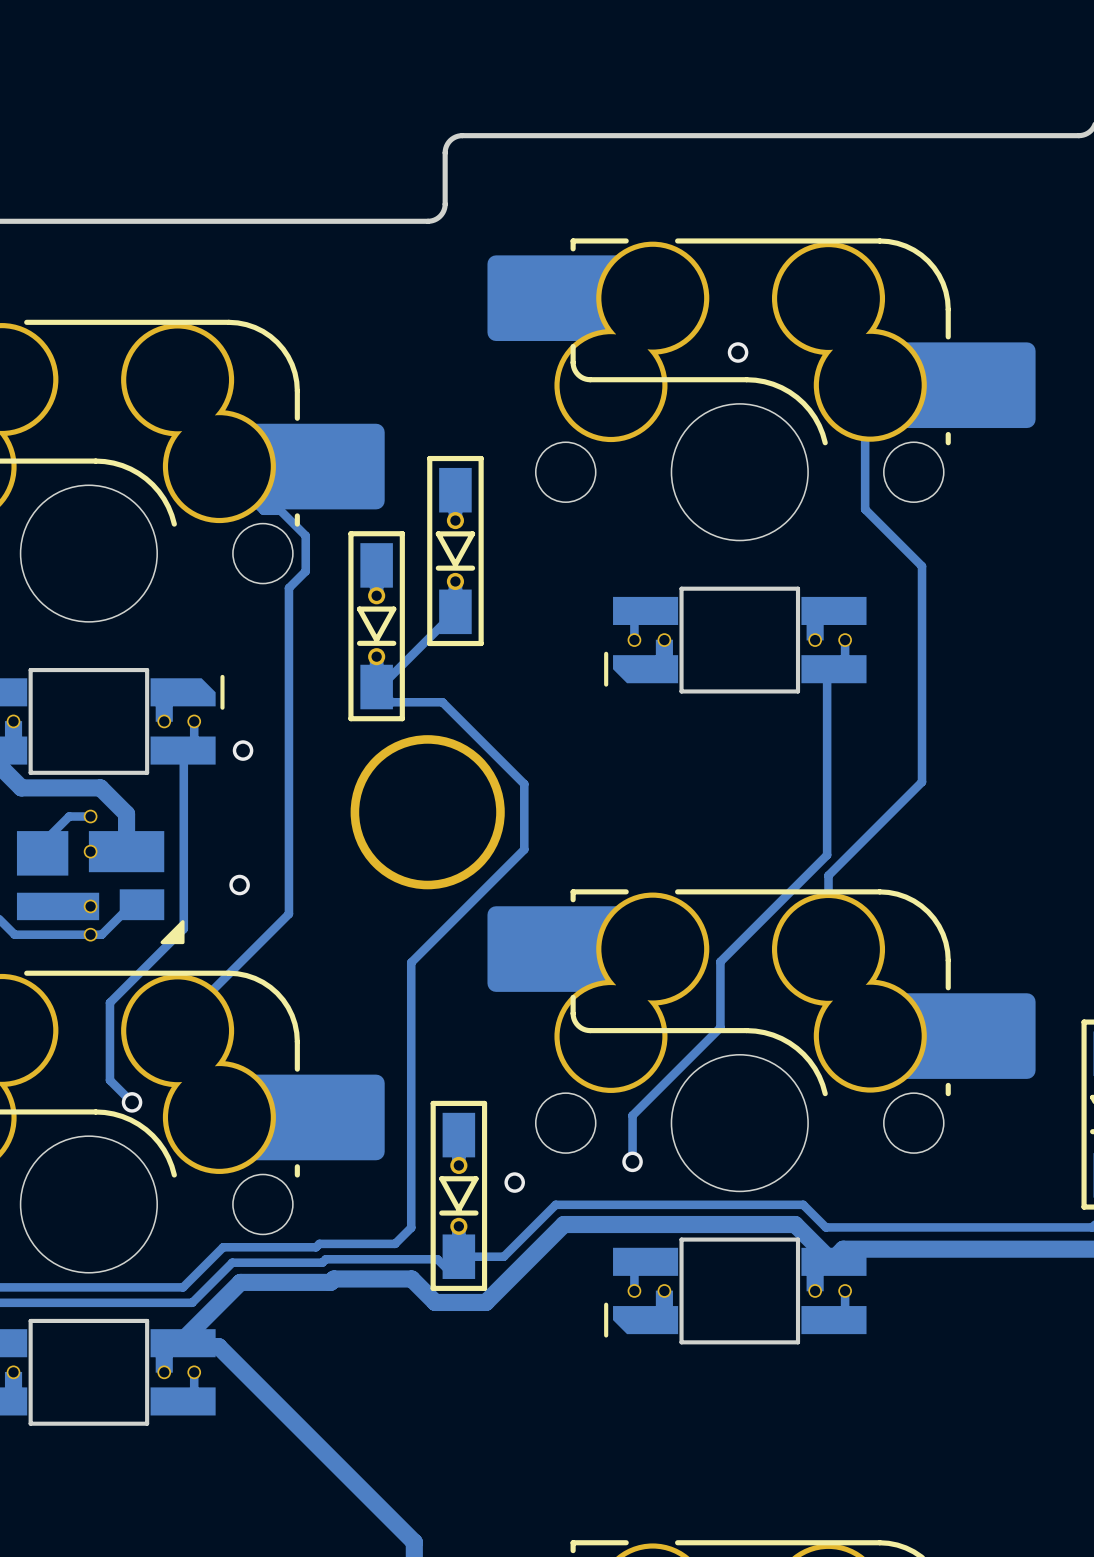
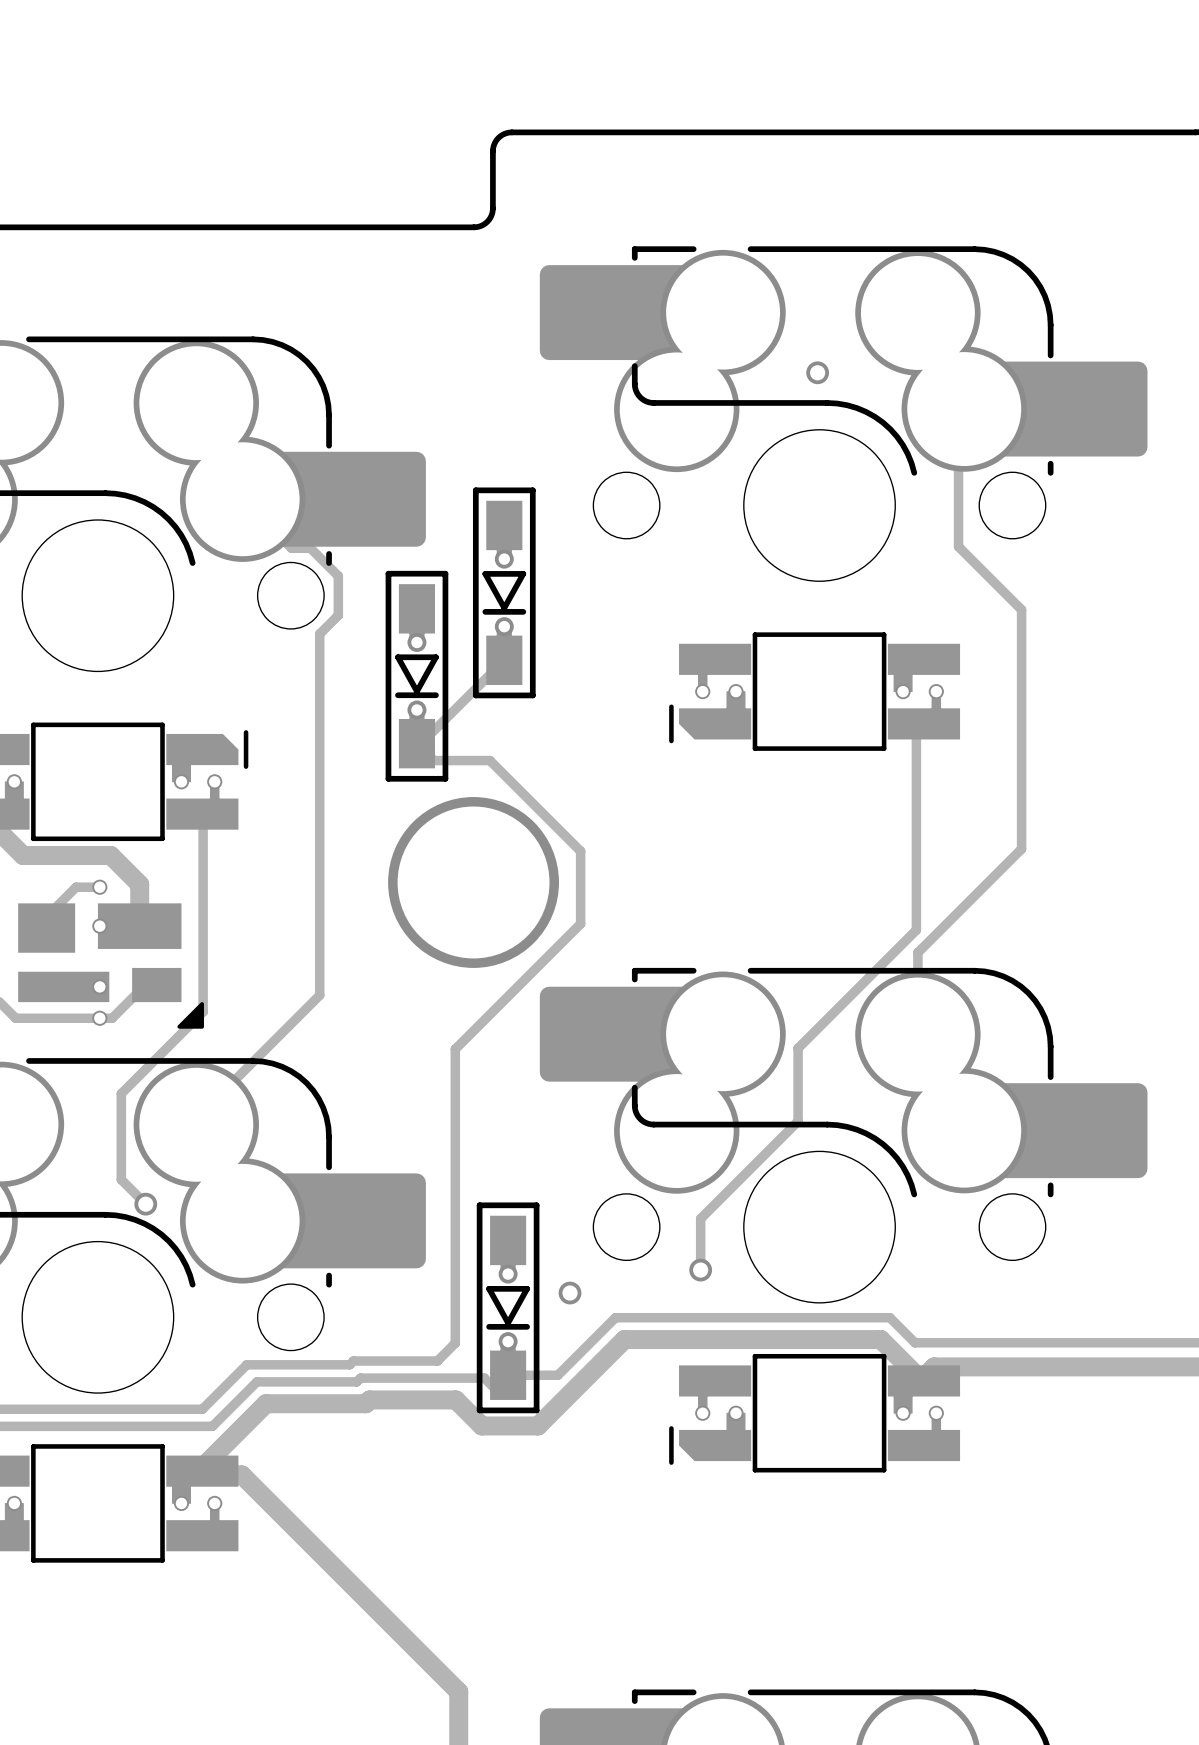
via: (243, 750) -> none
via: (239, 885) -> none

